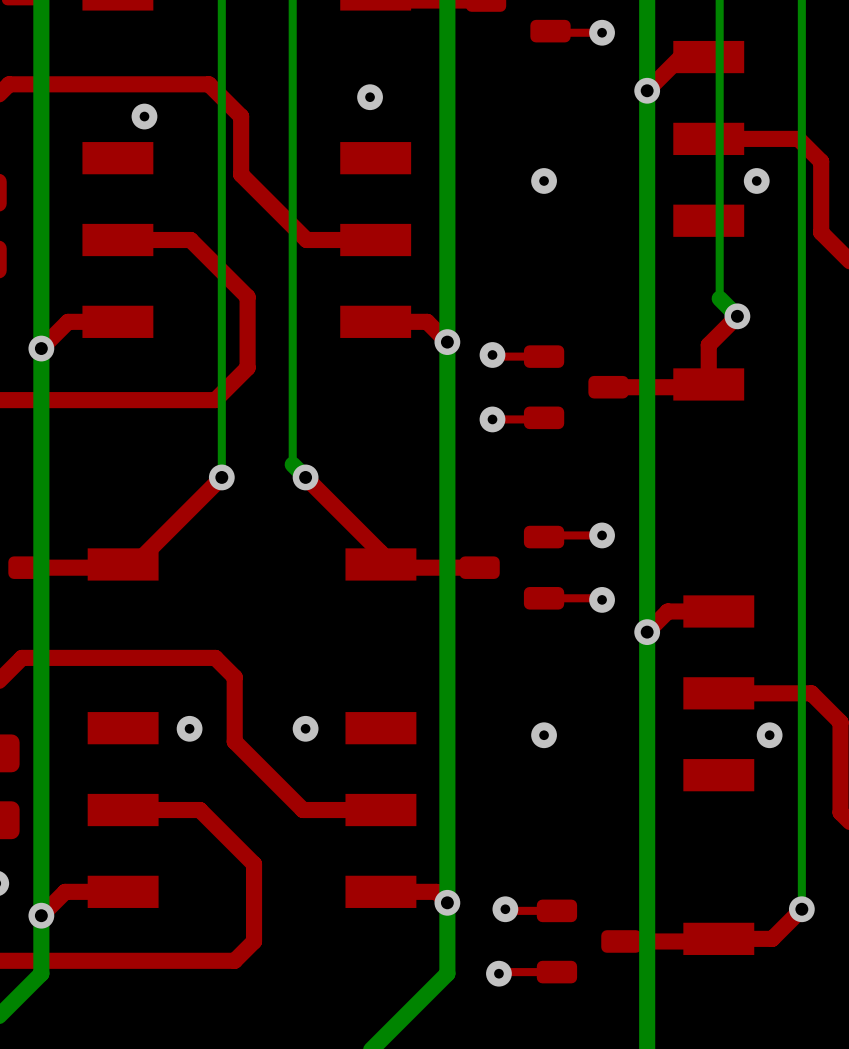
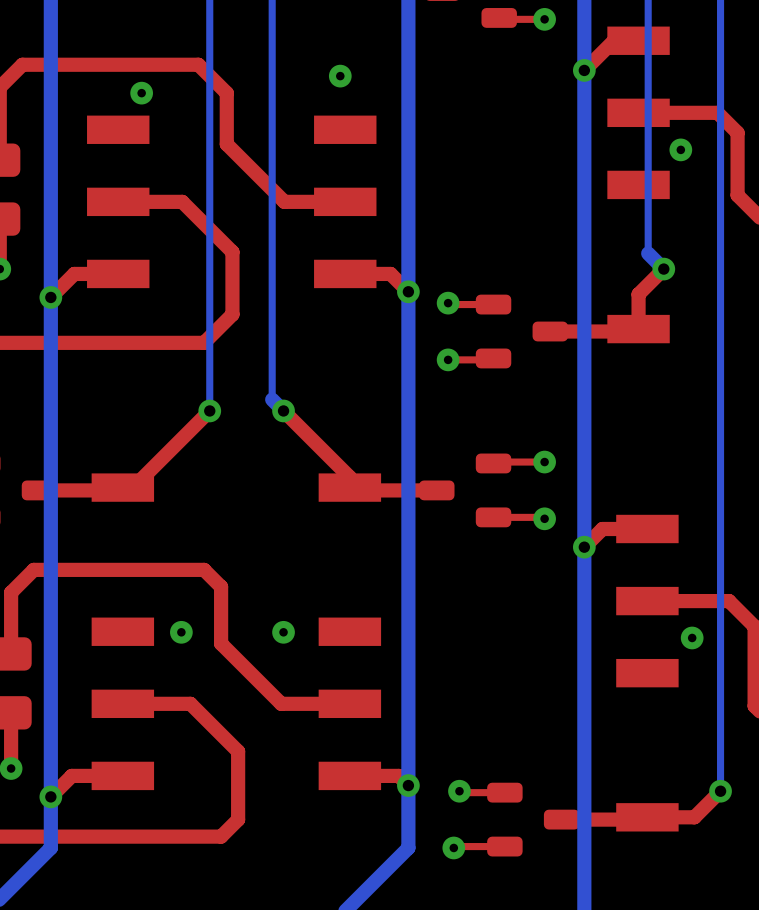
via: (544, 180) -> none
via: (544, 735) -> none

